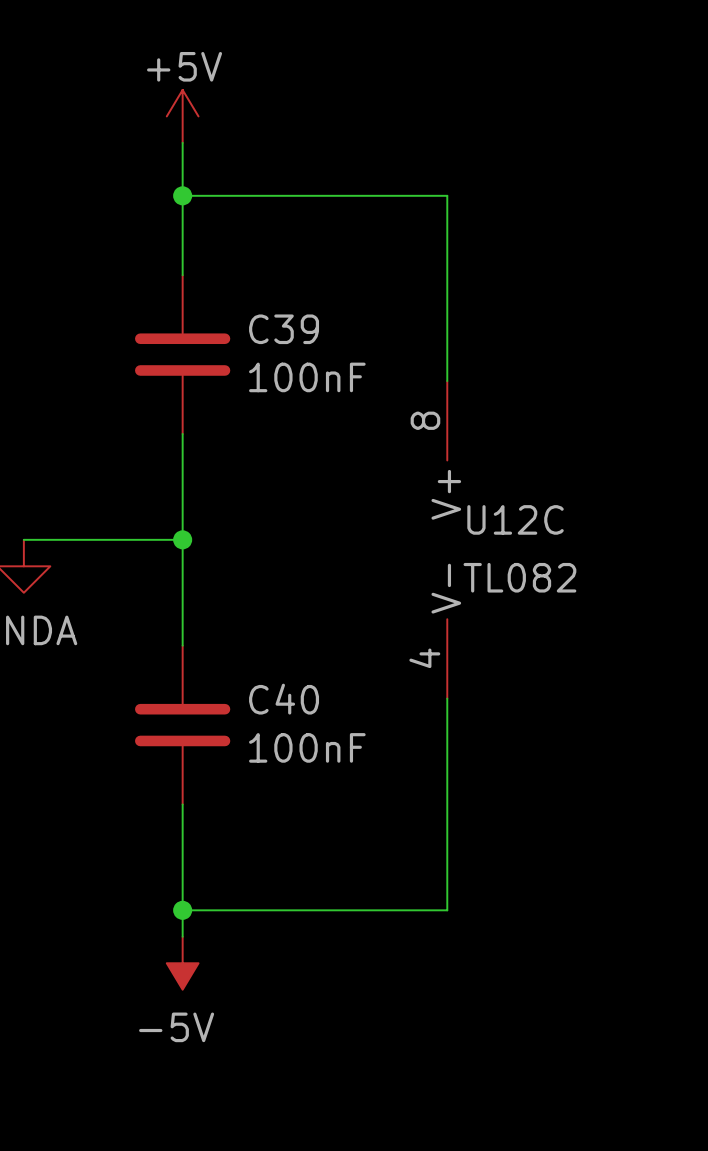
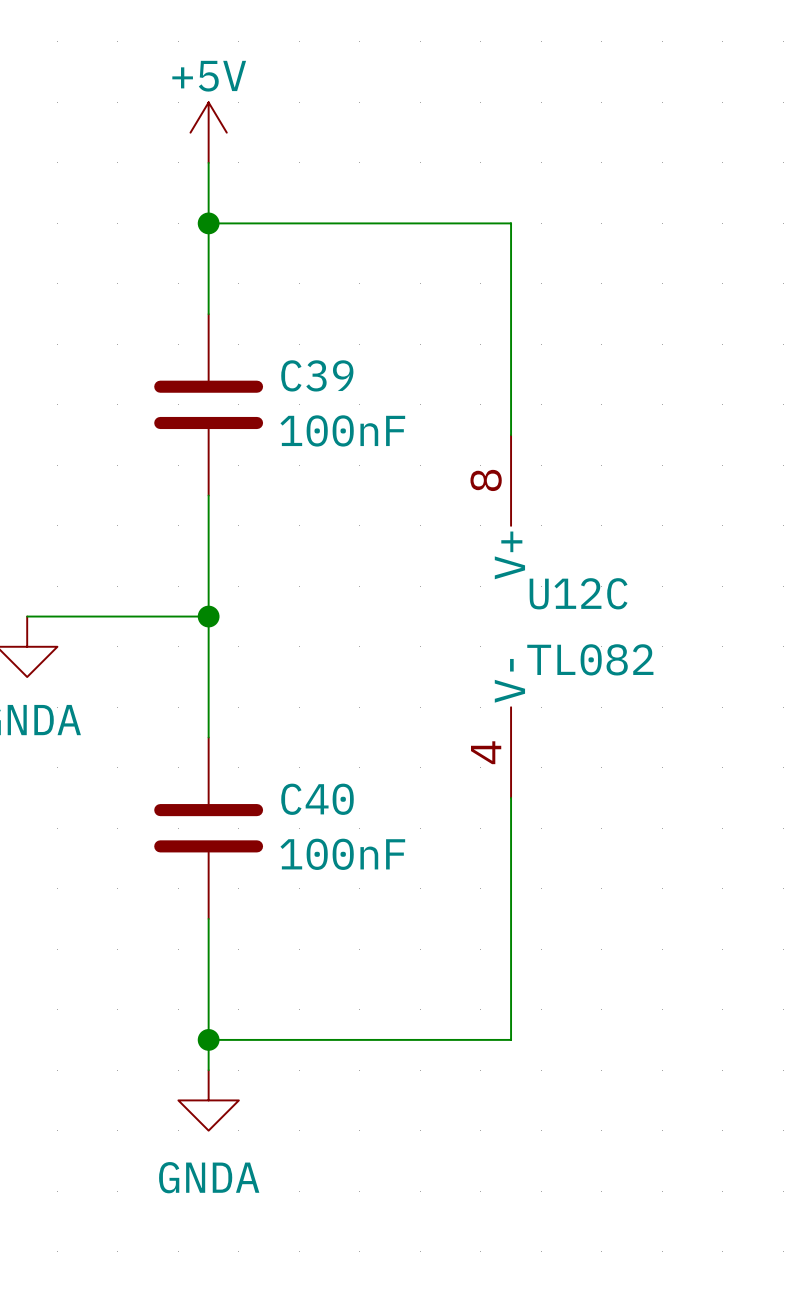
power symbol: -5V (182, 963) -> GNDA (208, 1100)

